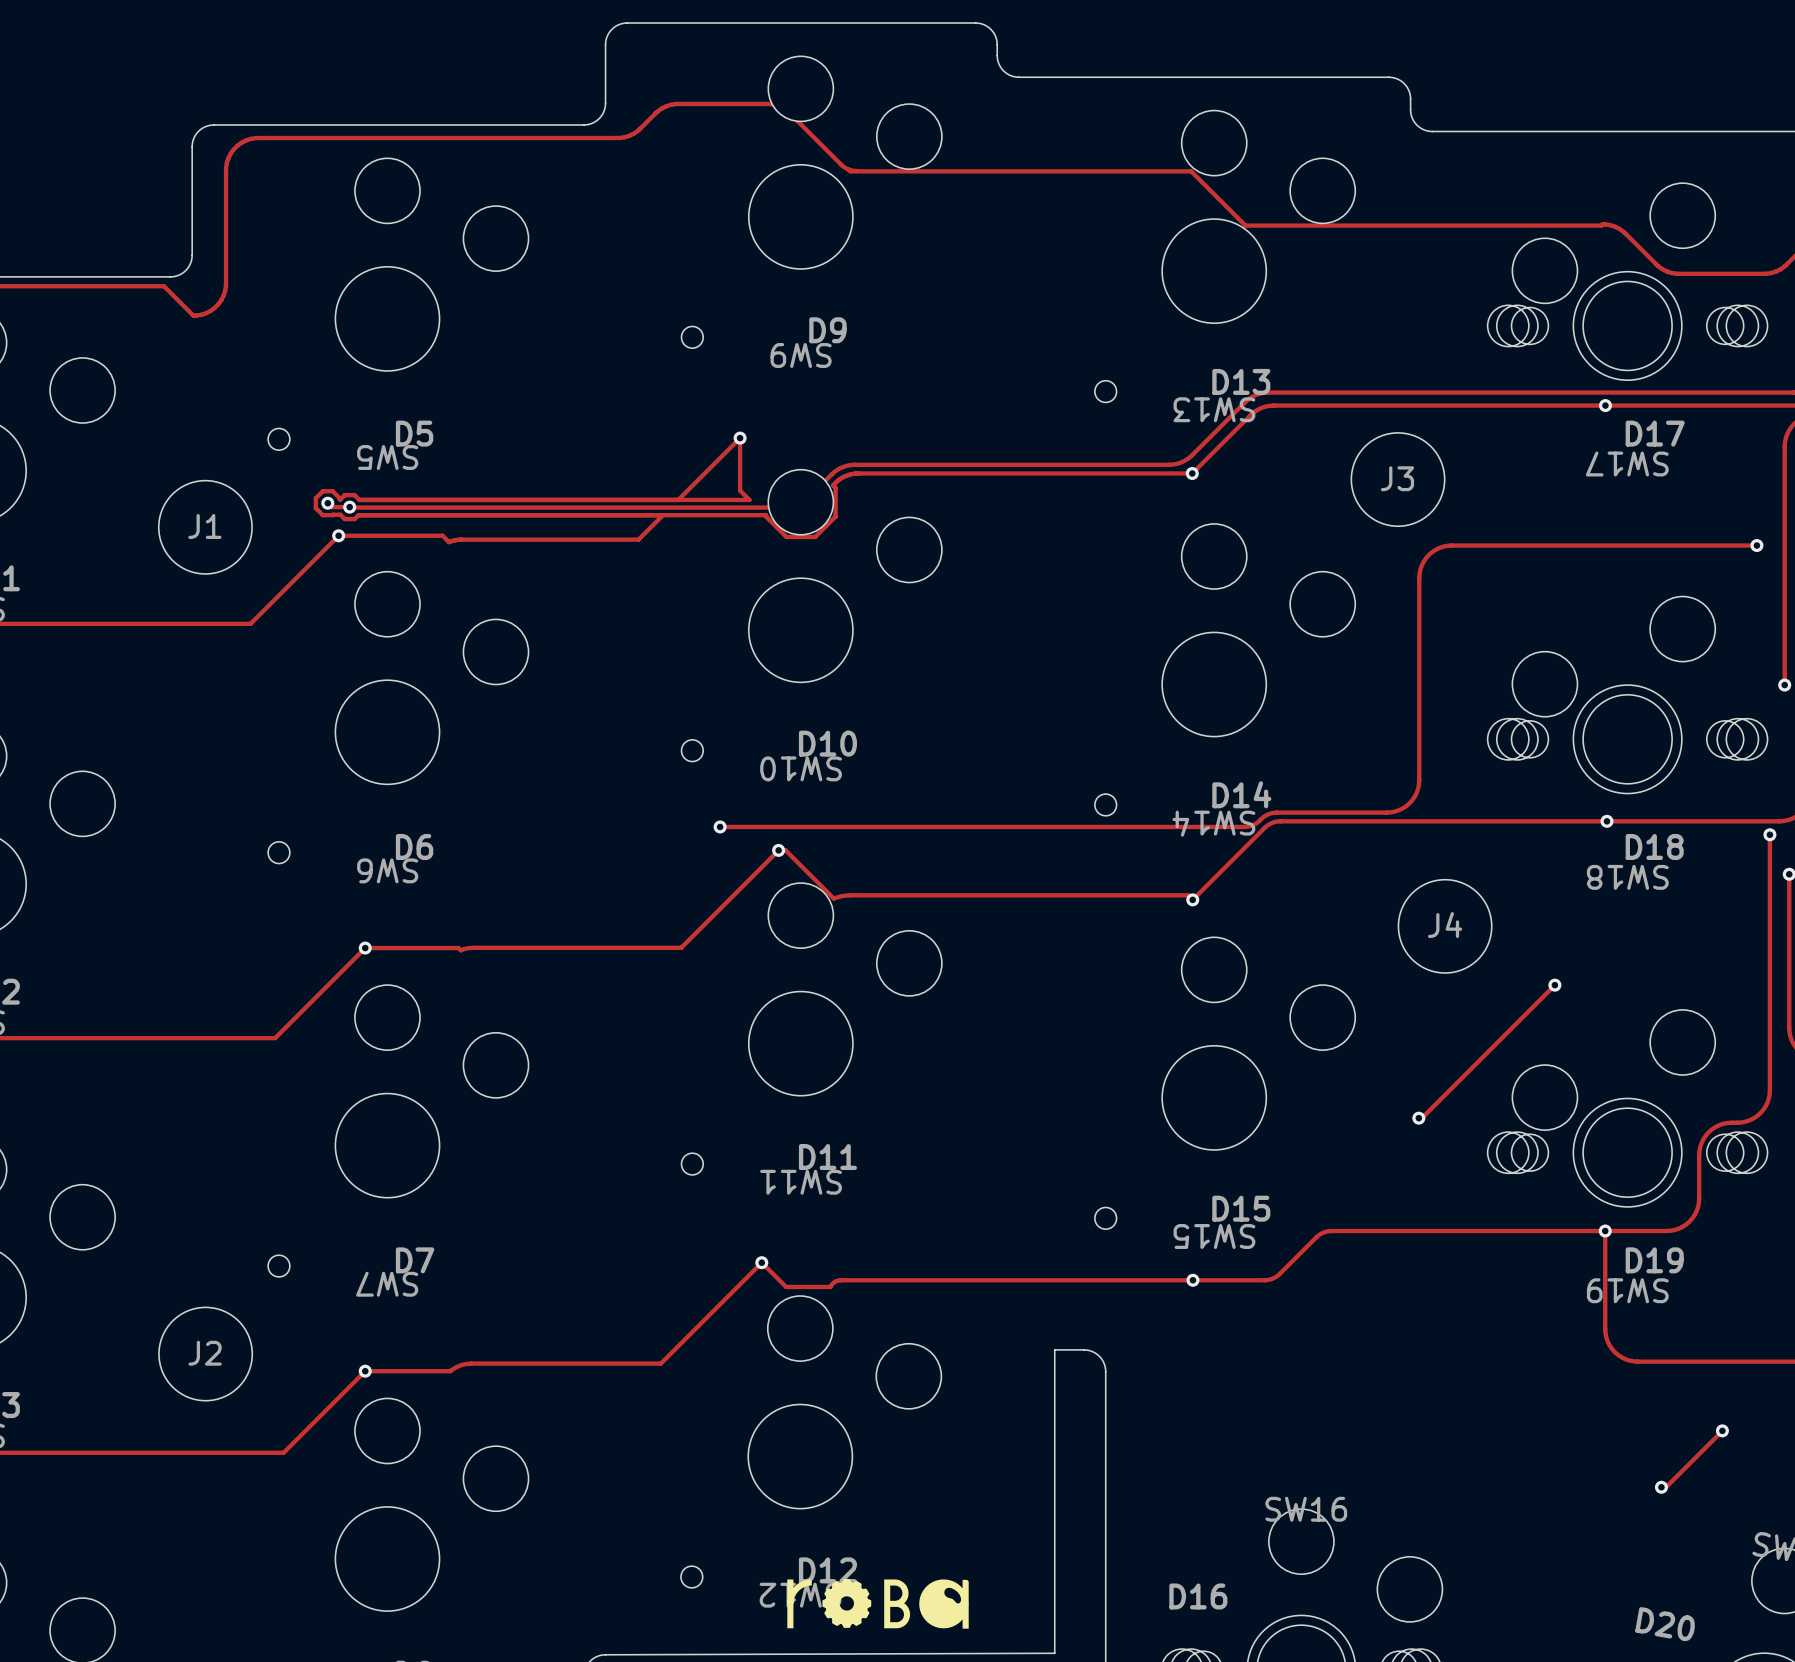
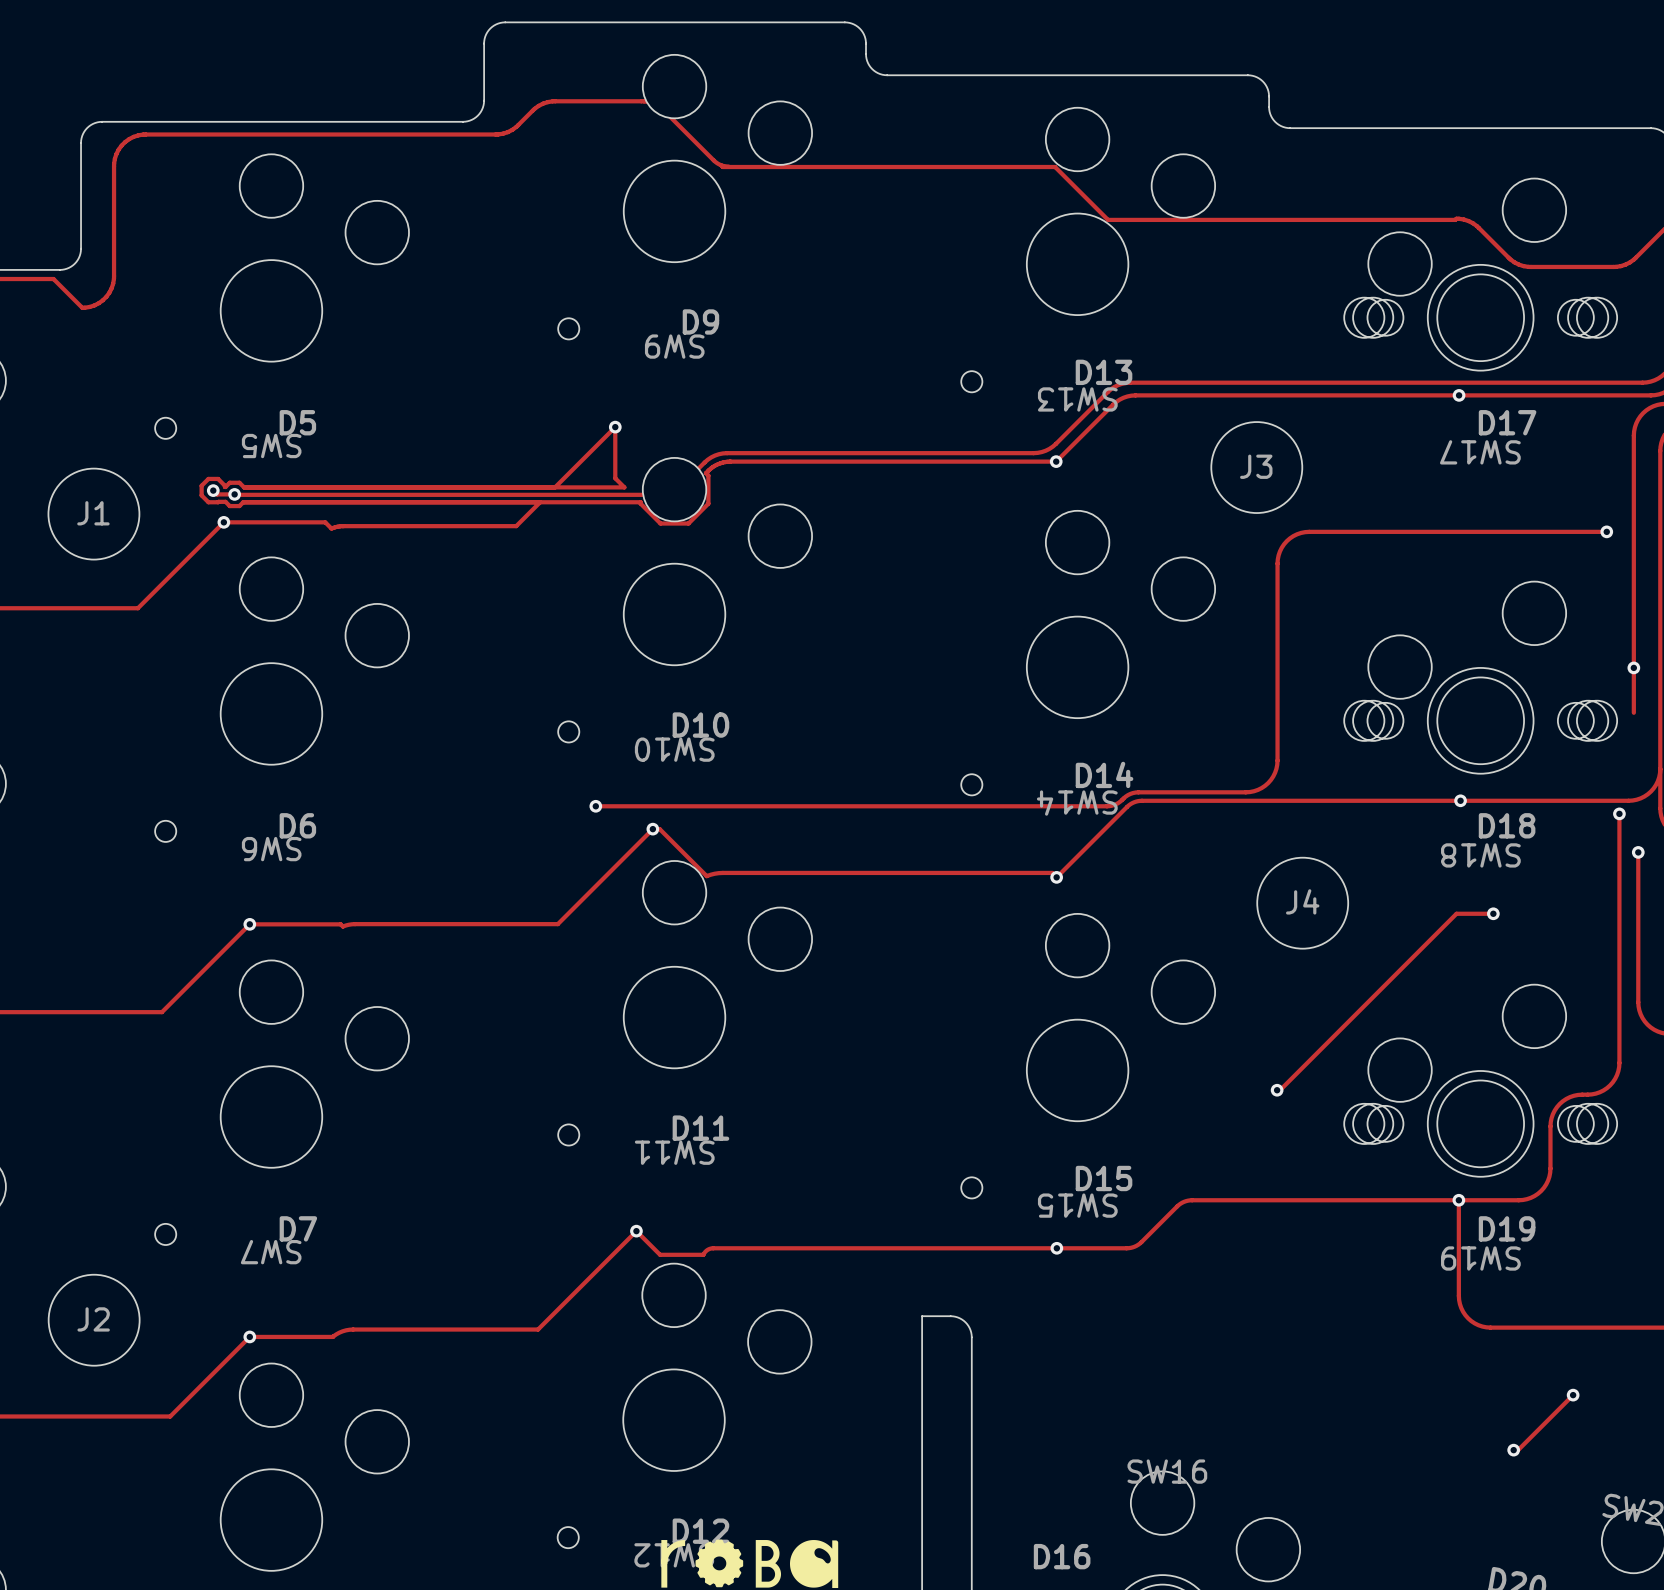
track: none -> (1633, 667) (1633, 712)
track: none -> (1493, 913) (1456, 913) (1409, 960)
via position: (1554, 985) -> (1493, 913)

